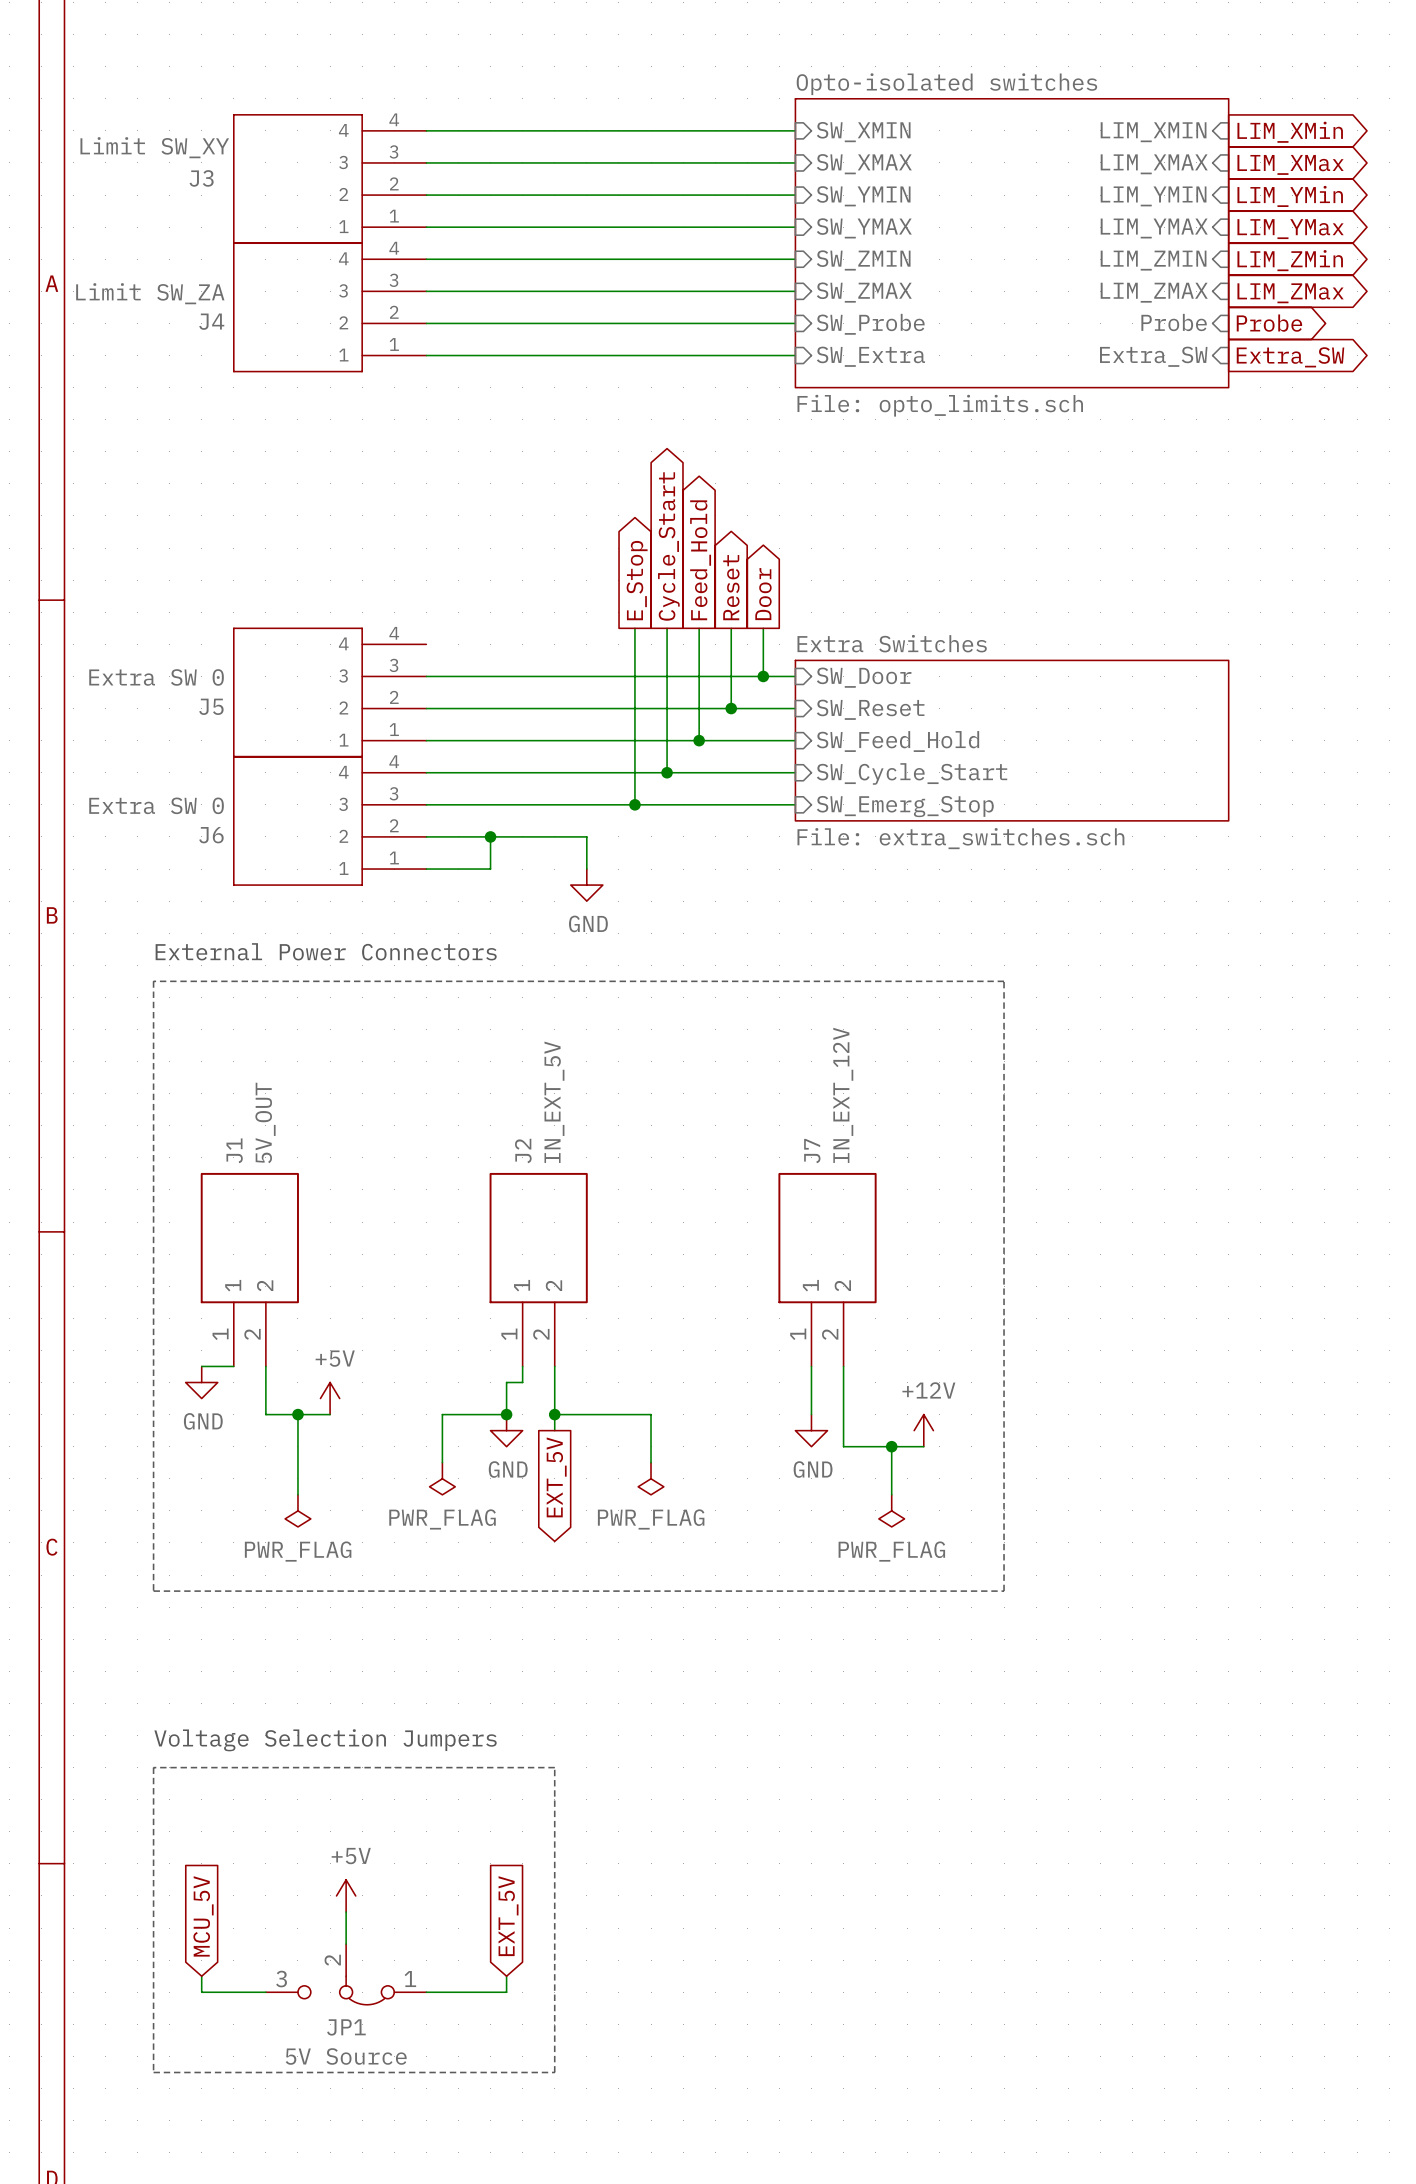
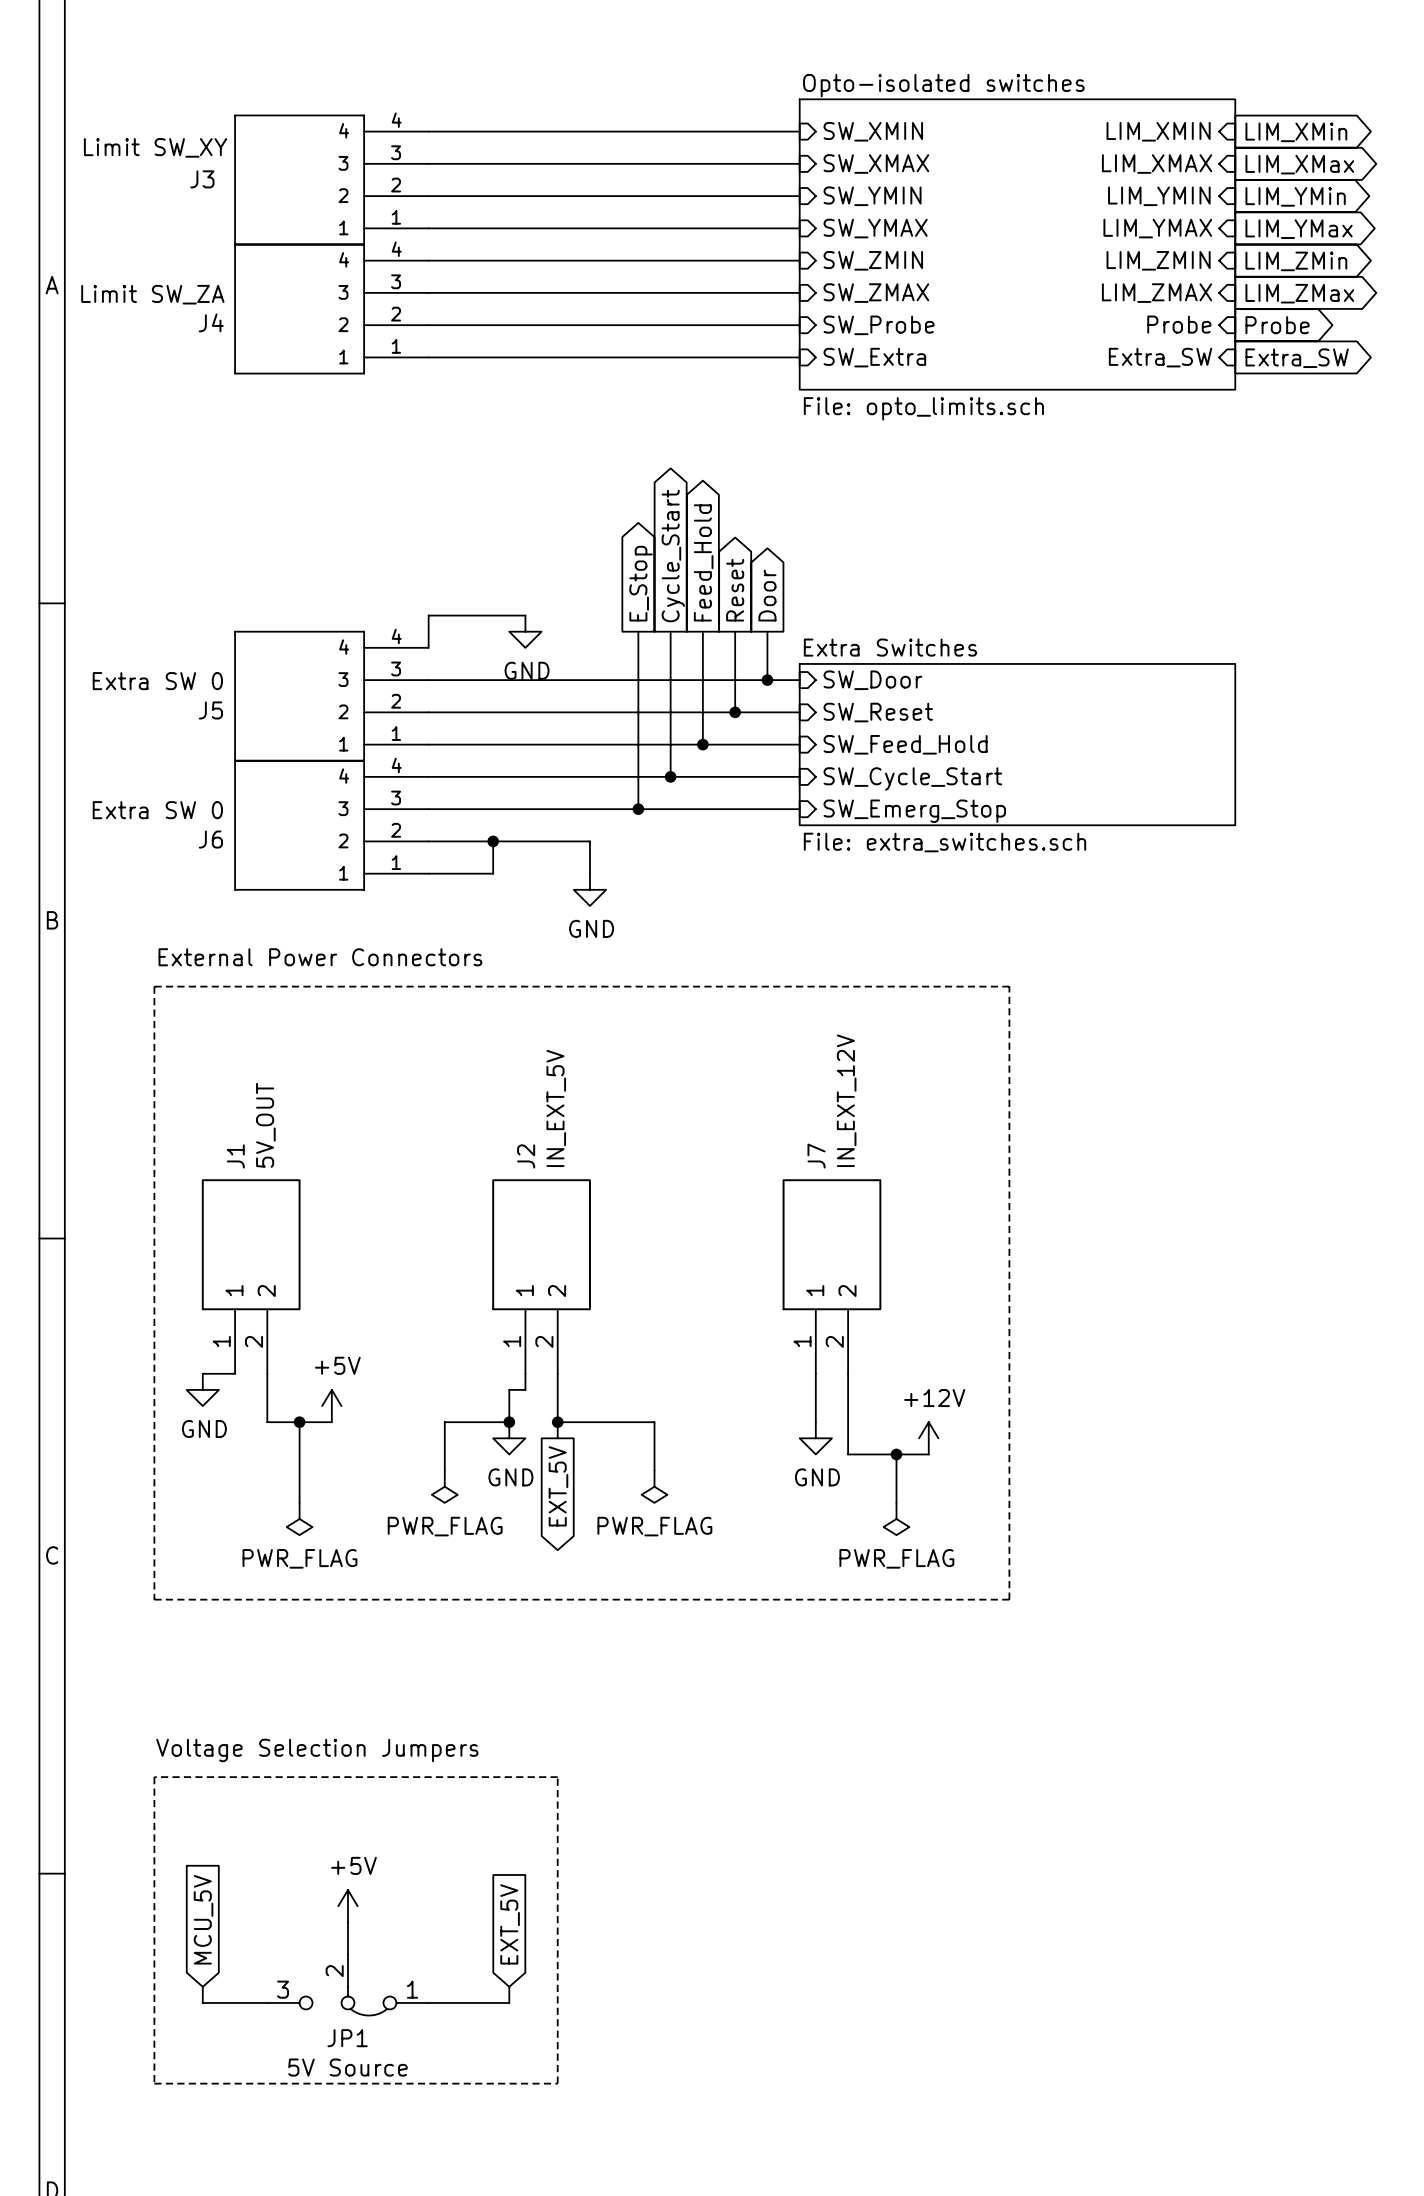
wire: none -> (525, 615) (428, 615) (428, 647)
power symbol: none -> GND (525, 631)

